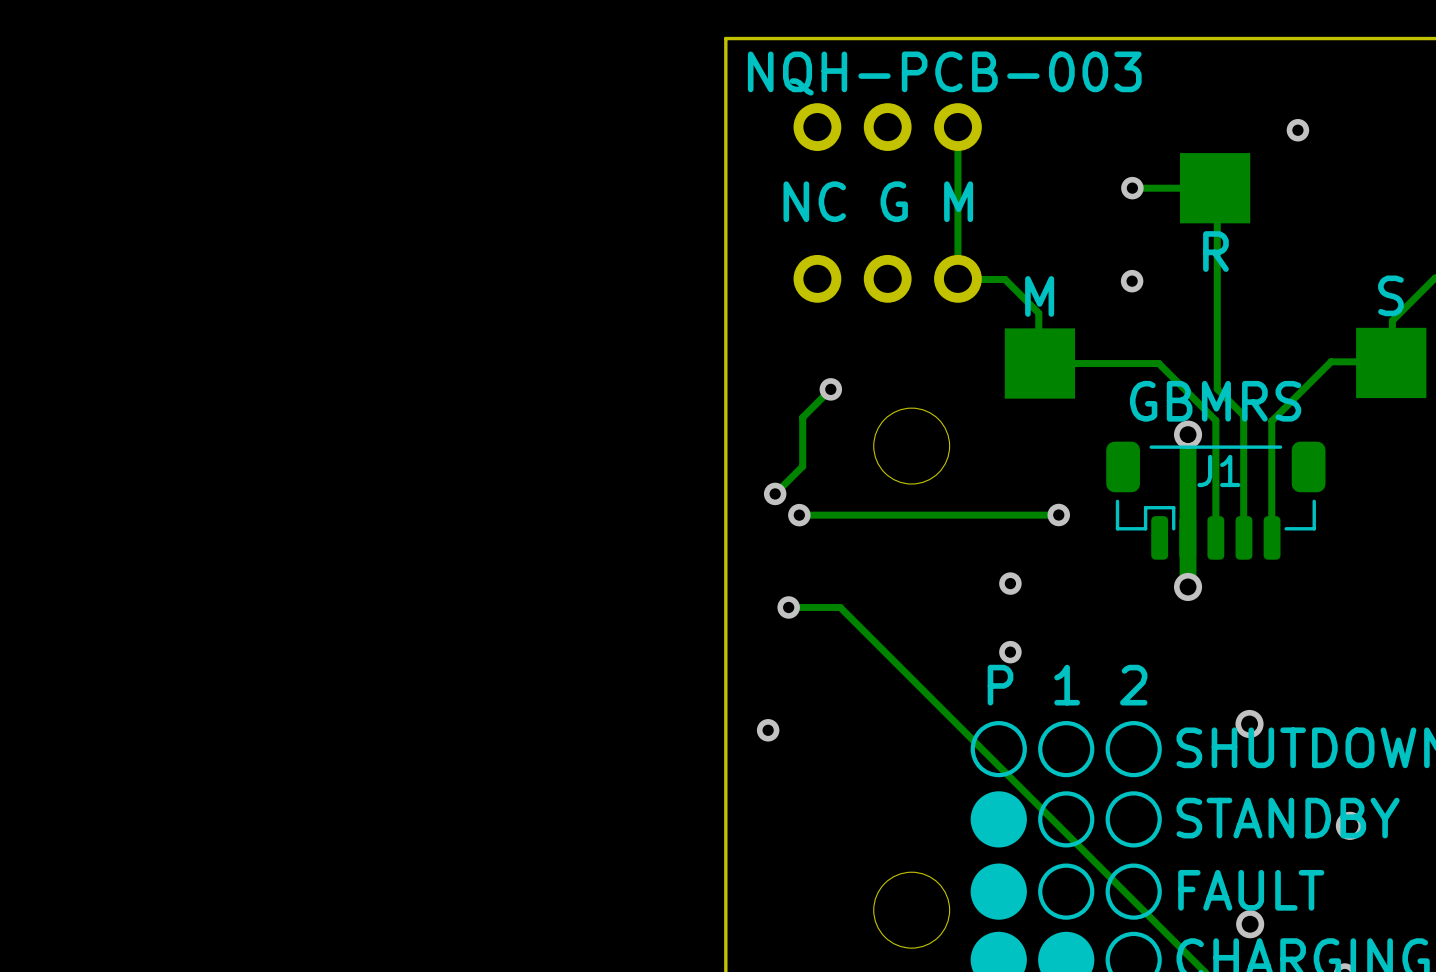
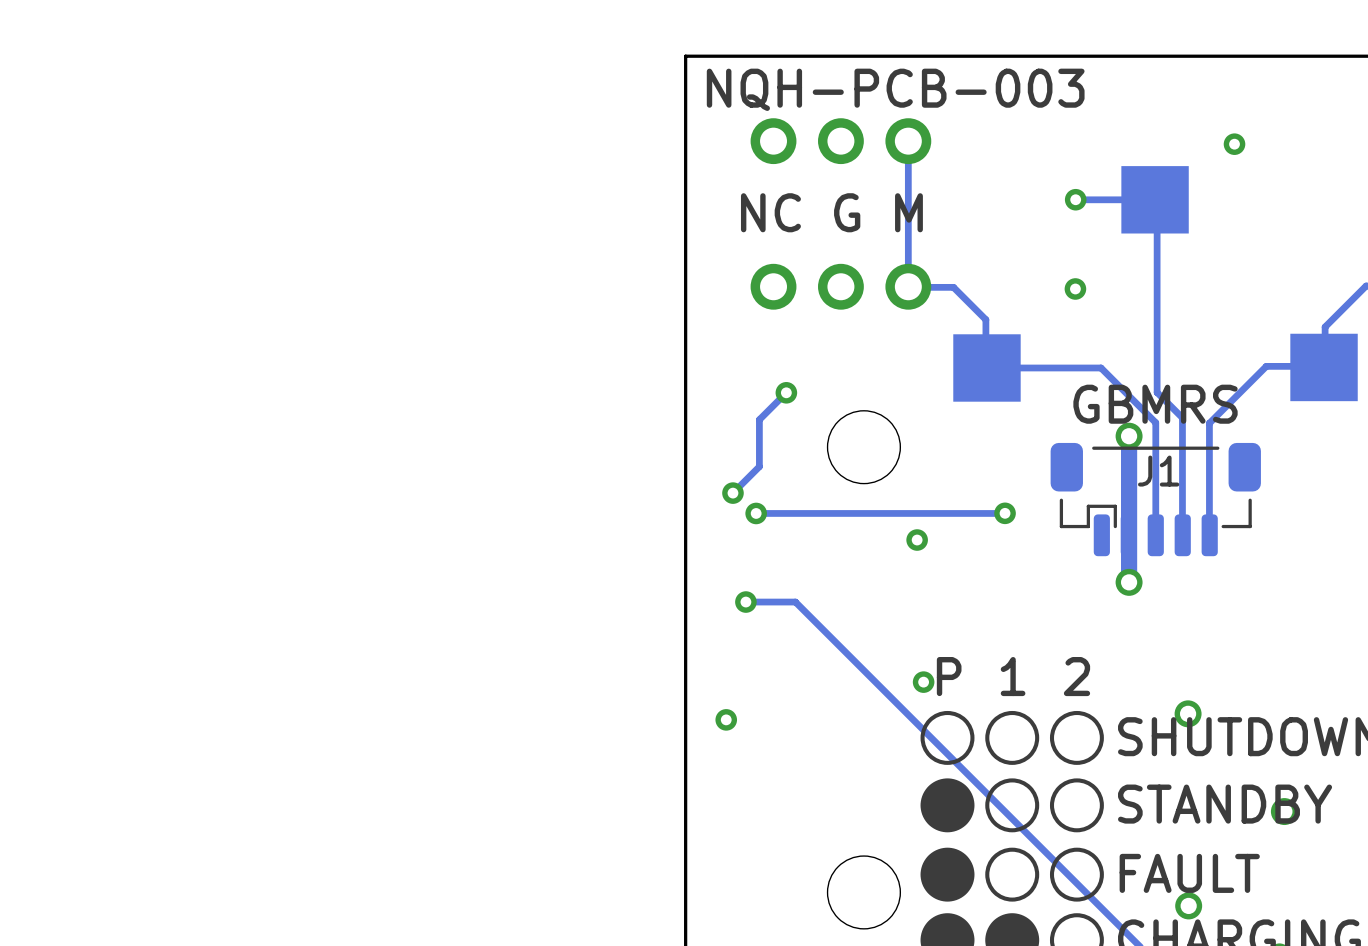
part text: R (1215, 251) -> none
part text: S (1390, 295) -> none
part text: M (1039, 296) -> none
via: none -> (917, 540)
via: (1010, 583) -> none
via position: (1010, 652) -> (923, 682)

